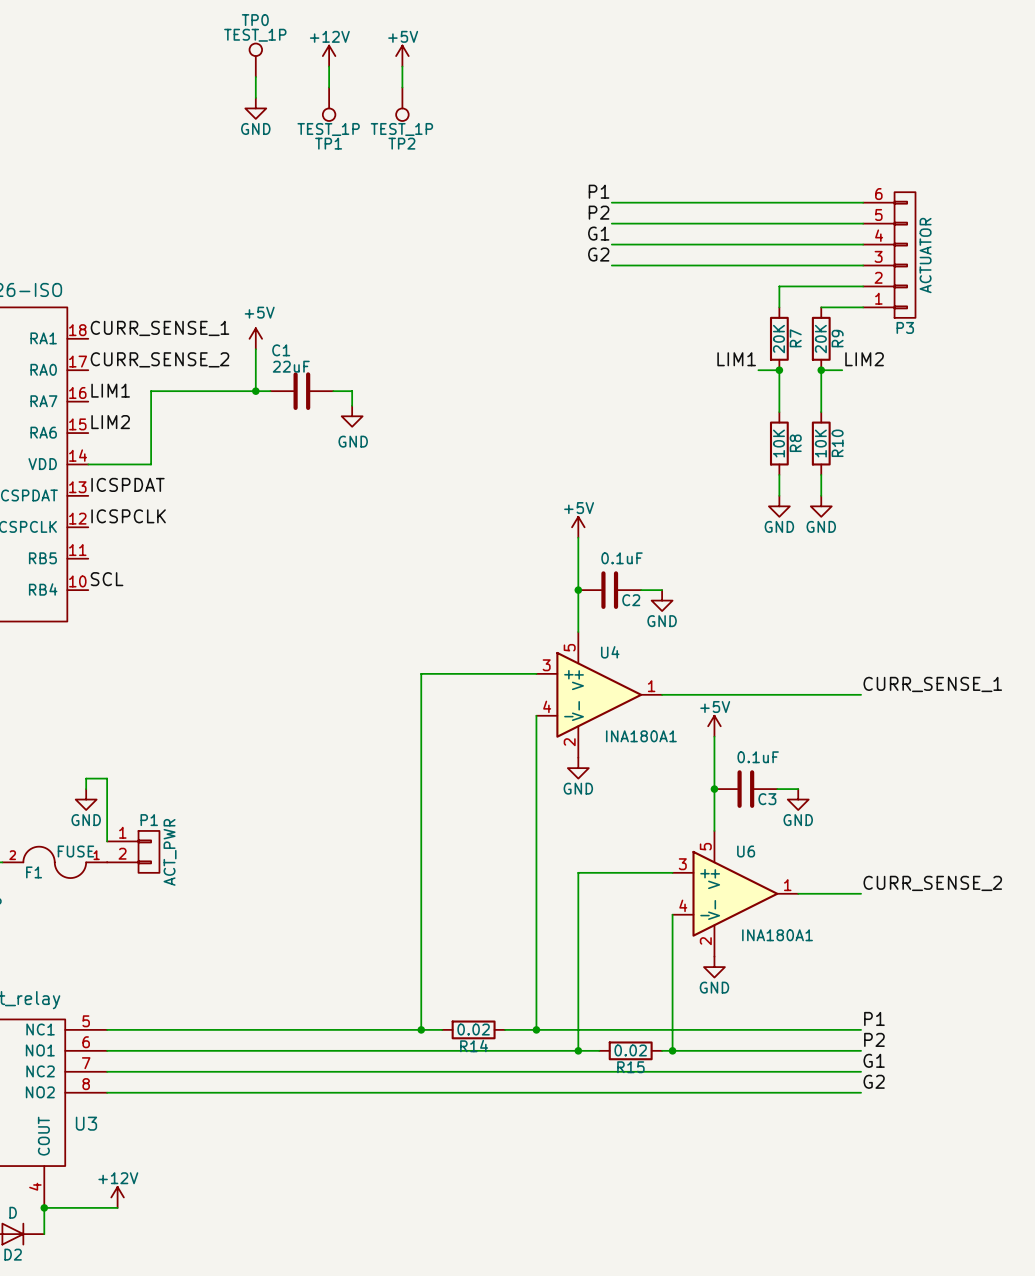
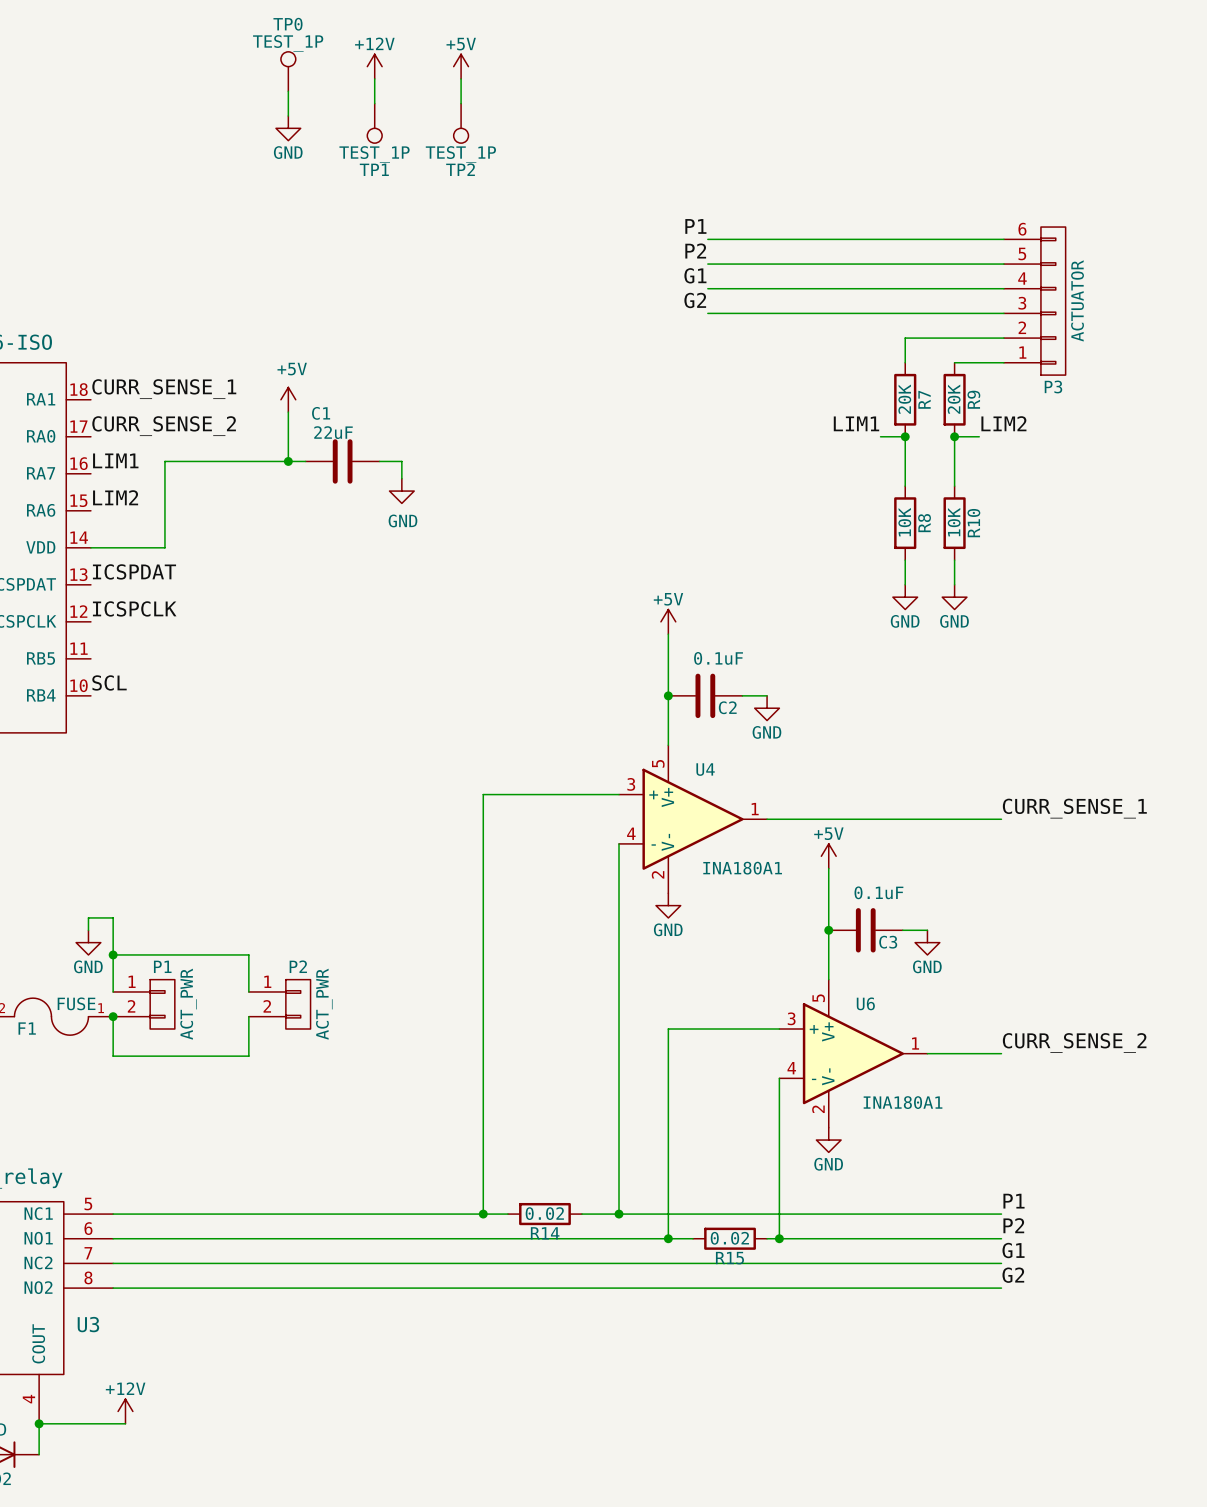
wire: none -> (113, 954) (248, 954) (248, 991)
junction: none -> (113, 954)
P2: none -> ACT_PWR (279, 1004)
wire: none -> (113, 1016) (113, 1056) (248, 1056) (248, 1016)
junction: none -> (113, 1016)

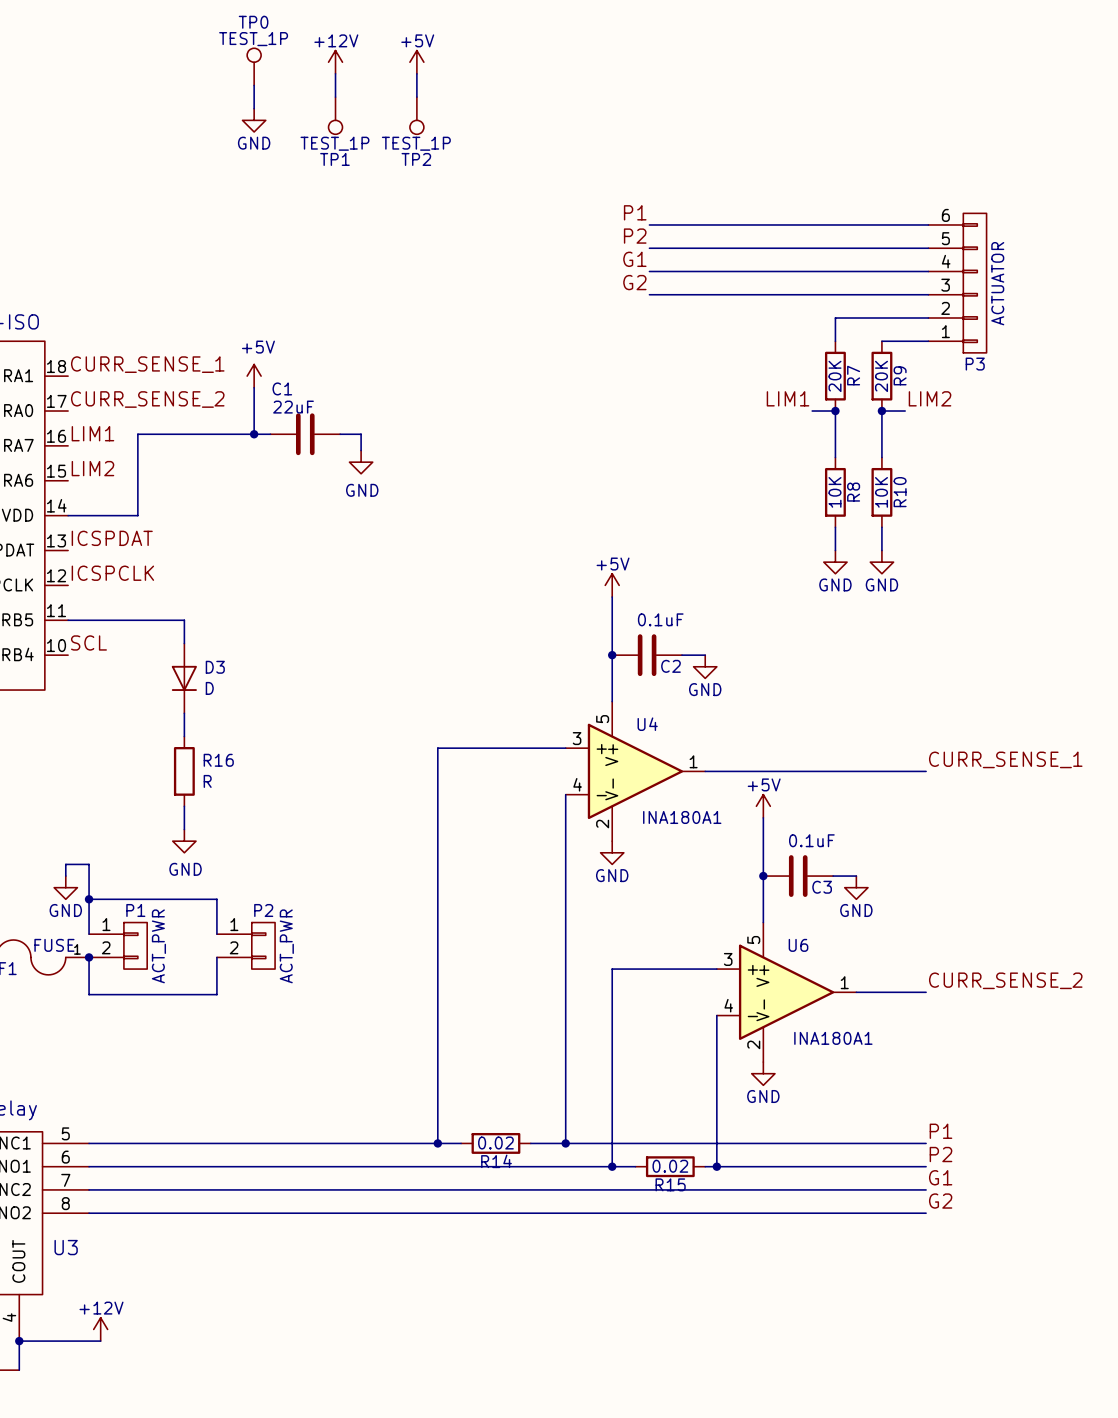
wire: none -> (68, 620) (184, 620) (184, 643)
D3: none -> D (184, 678)
wire: none -> (184, 713) (184, 736)
R16: none -> R (184, 771)
wire: none -> (184, 806) (184, 829)
power symbol: none -> GND (184, 841)

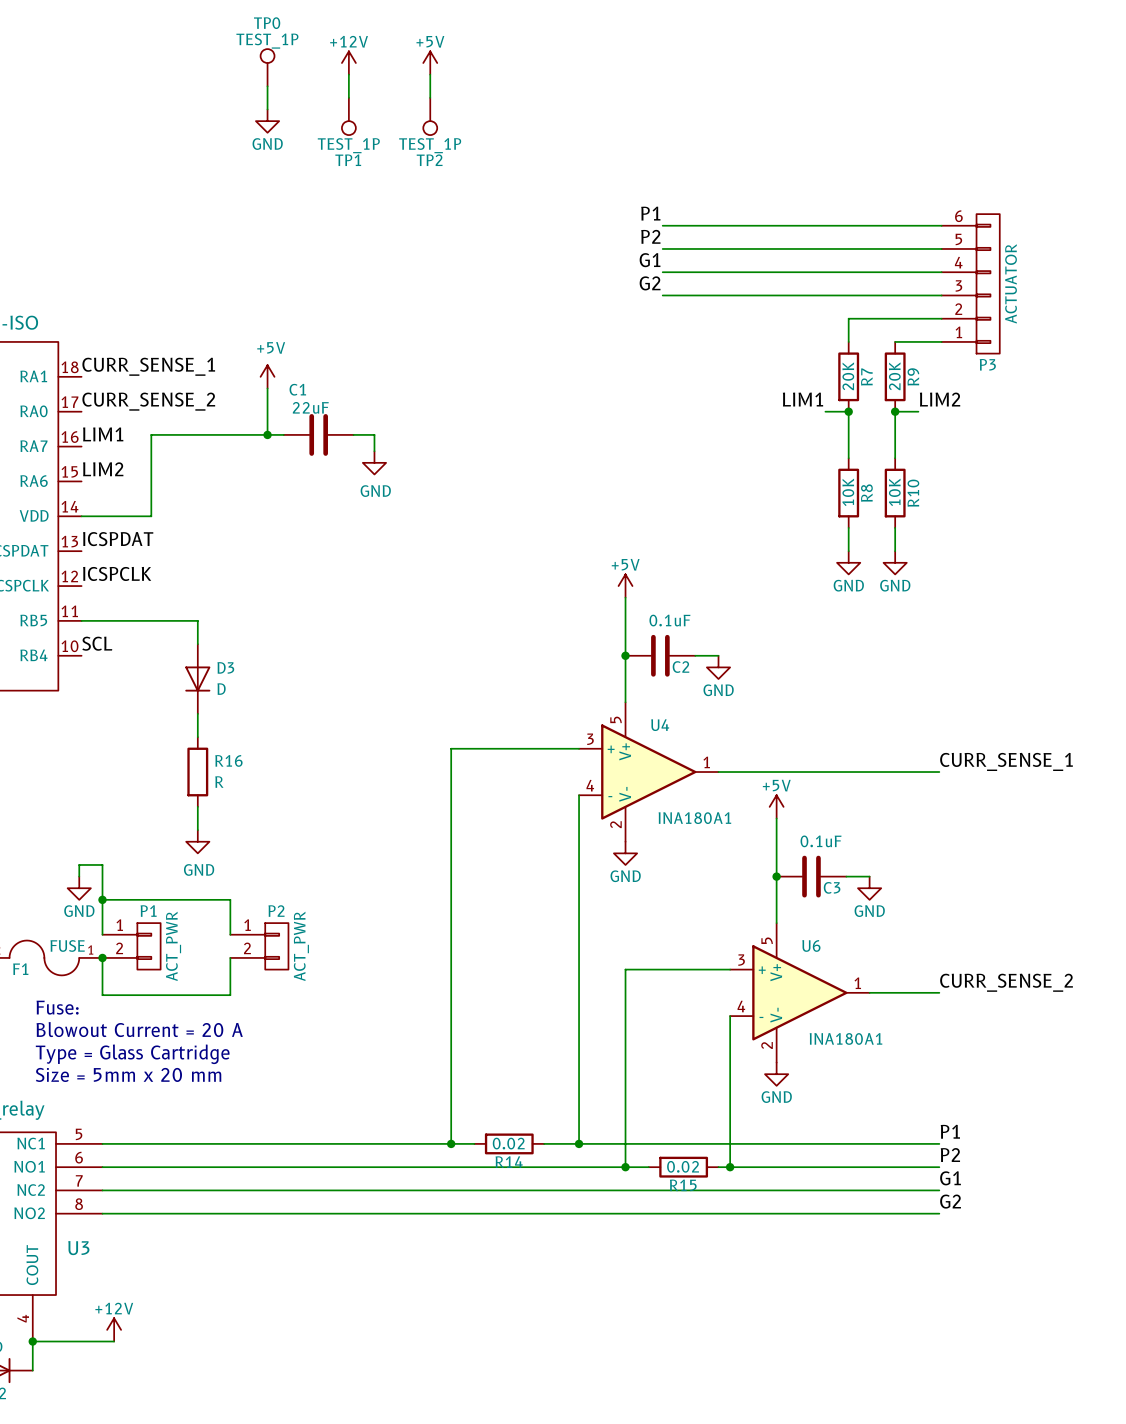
text: none -> Fuse: (57, 1007)
text: none -> Blowout Current = 20 A (139, 1029)
text: none -> Type = Glass Cartridge (132, 1054)
text: none -> Size = 5mm x 20 mm (128, 1074)

